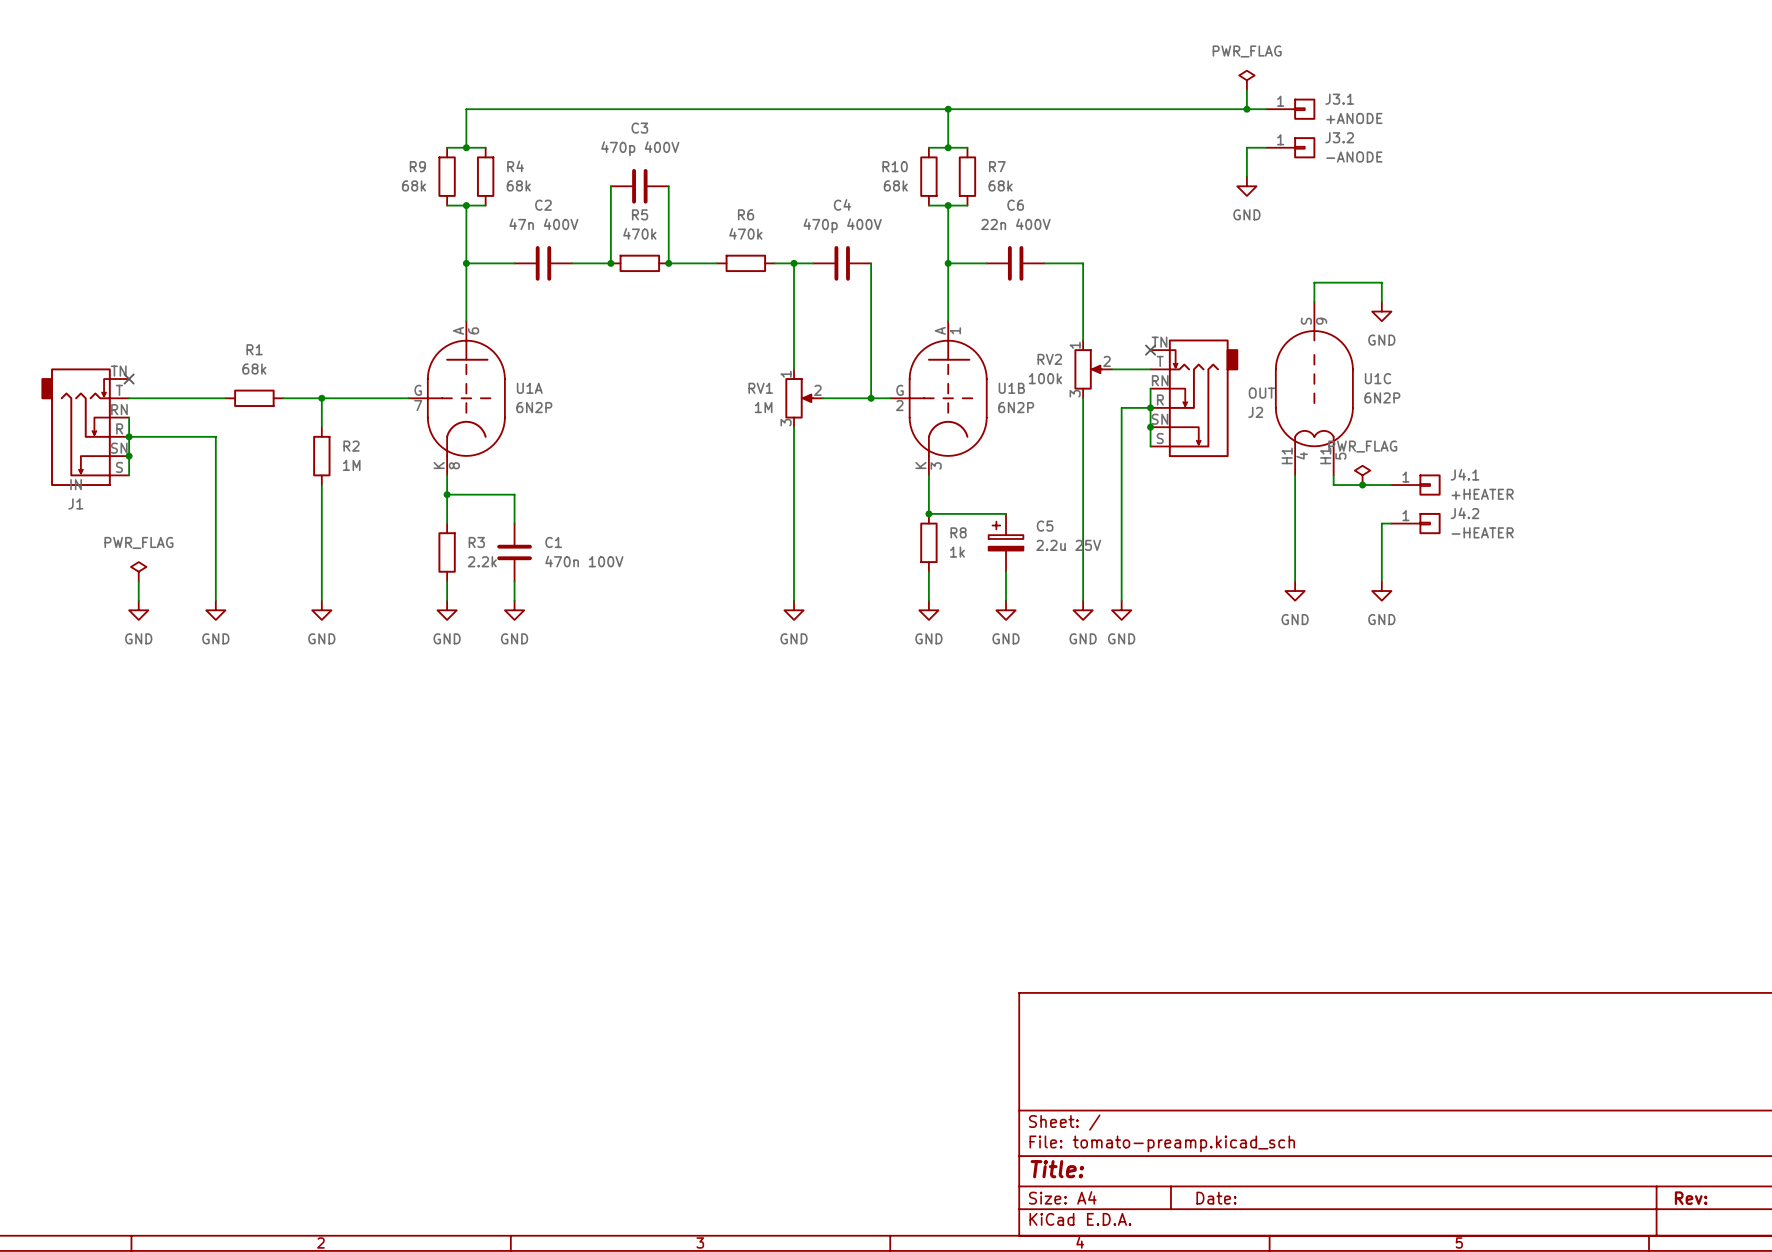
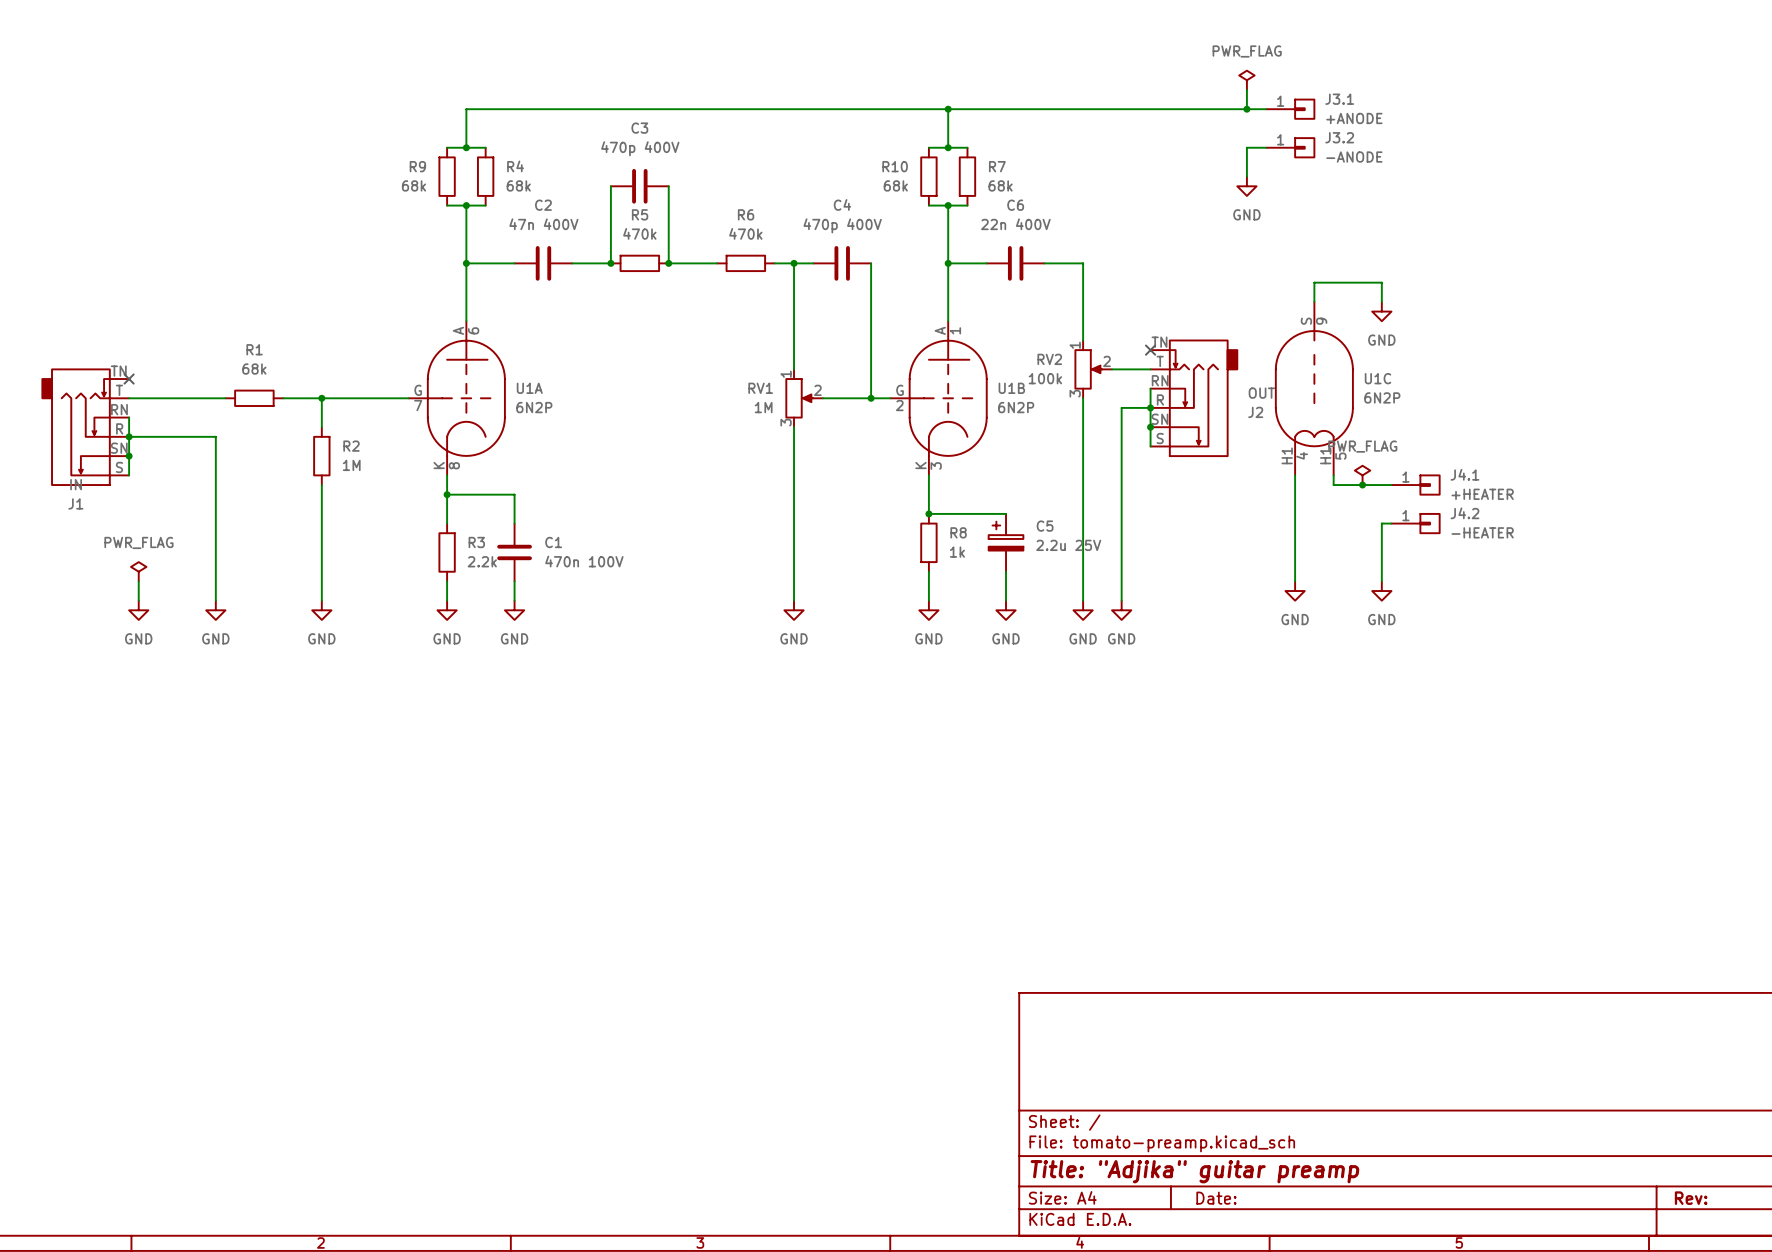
title block: Title: (1057, 1169) -> Title: "Adjika" guitar preamp (1194, 1171)

